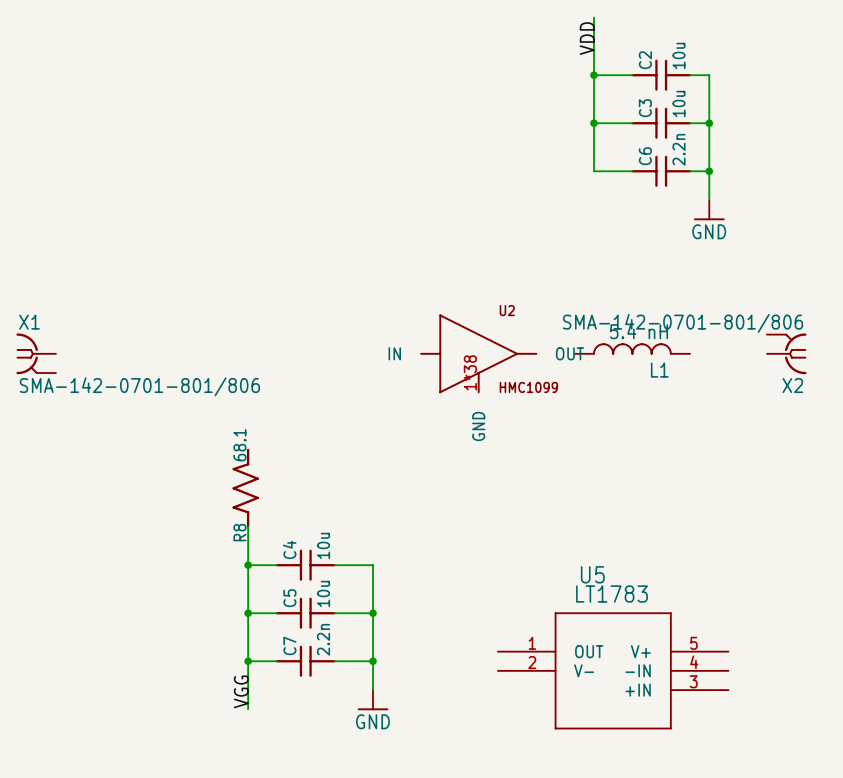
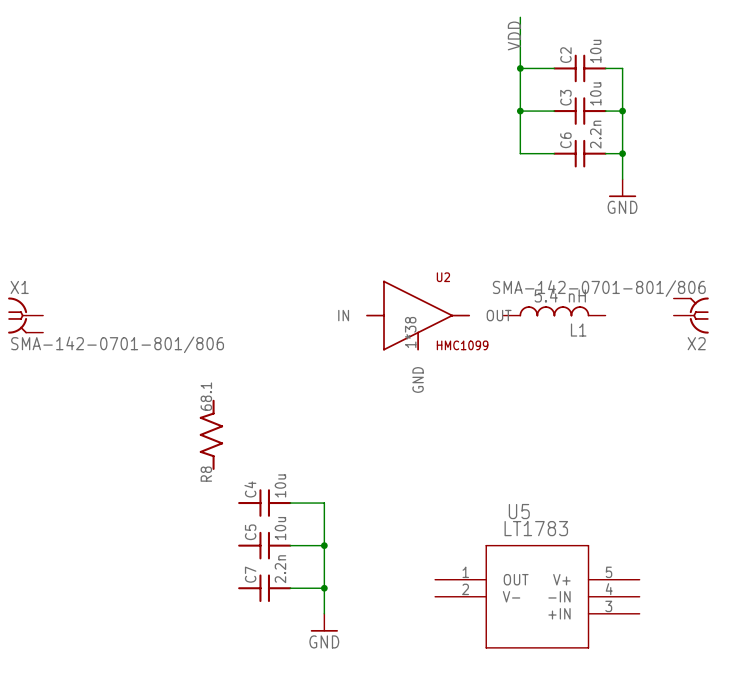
wire: (248, 526) (248, 709) -> none
wire: (248, 565) (276, 565) -> none
junction: (248, 565) -> none
wire: (248, 613) (276, 613) -> none
junction: (248, 613) -> none
wire: (248, 661) (276, 661) -> none
junction: (248, 661) -> none
label: VGG (241, 691) -> none

